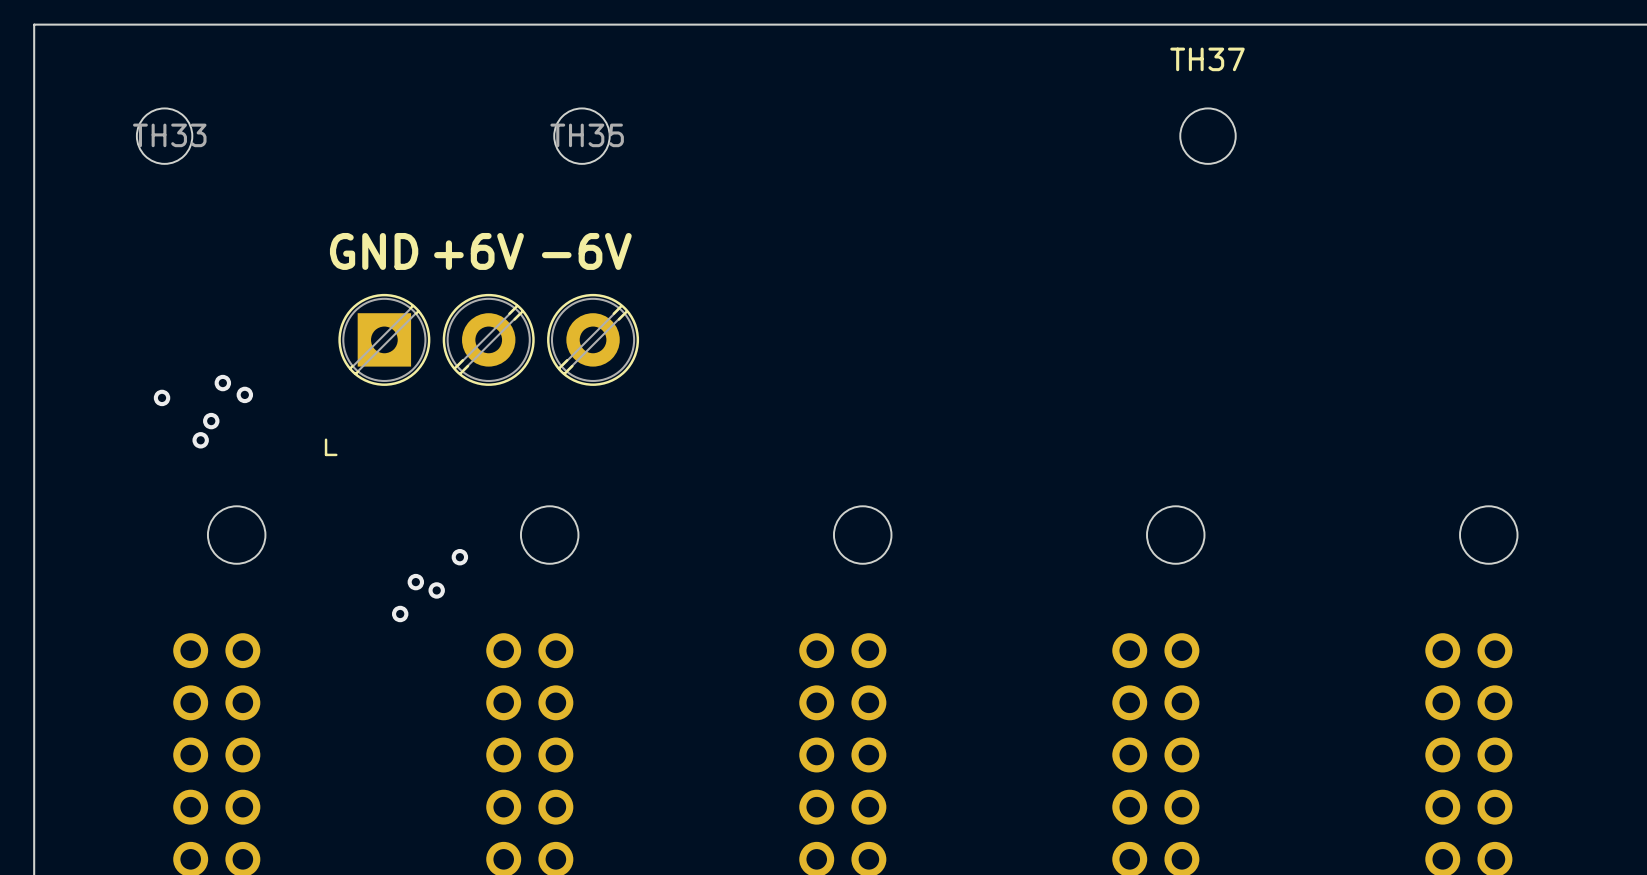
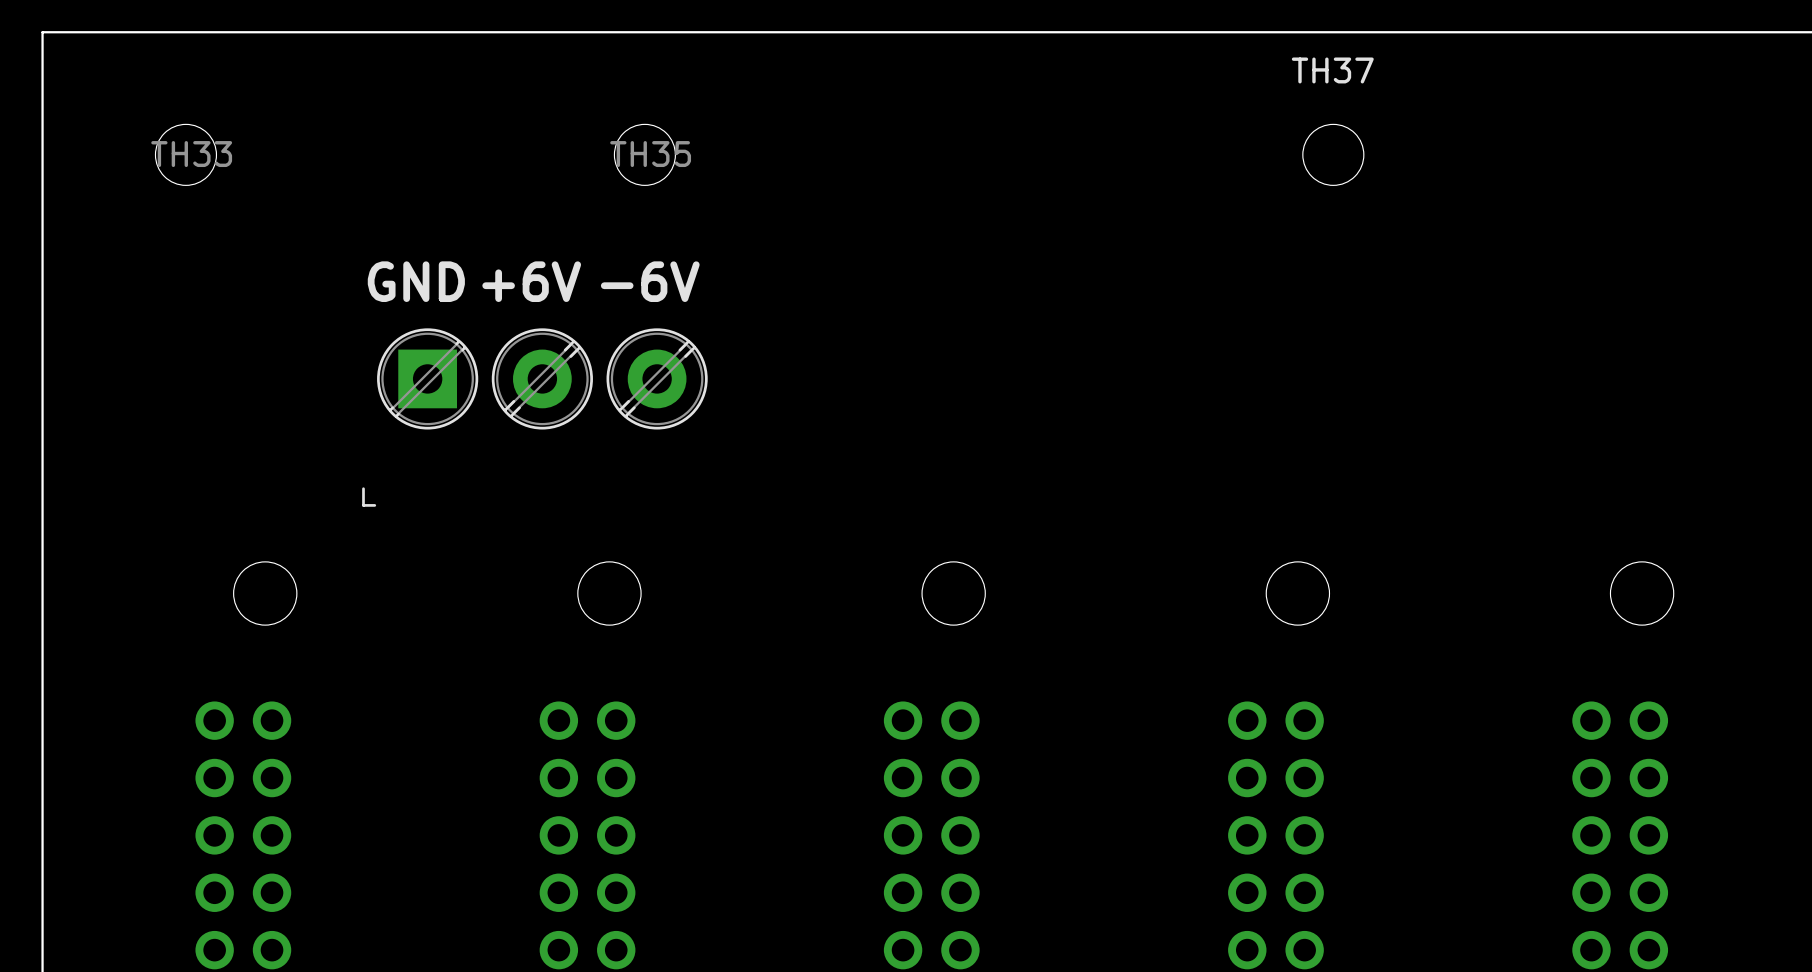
via: (222, 383) -> none
via: (244, 394) -> none
via: (162, 397) -> none
via: (211, 421) -> none
via: (200, 440) -> none
via: (459, 557) -> none
via: (415, 582) -> none
via: (436, 590) -> none
via: (400, 613) -> none

